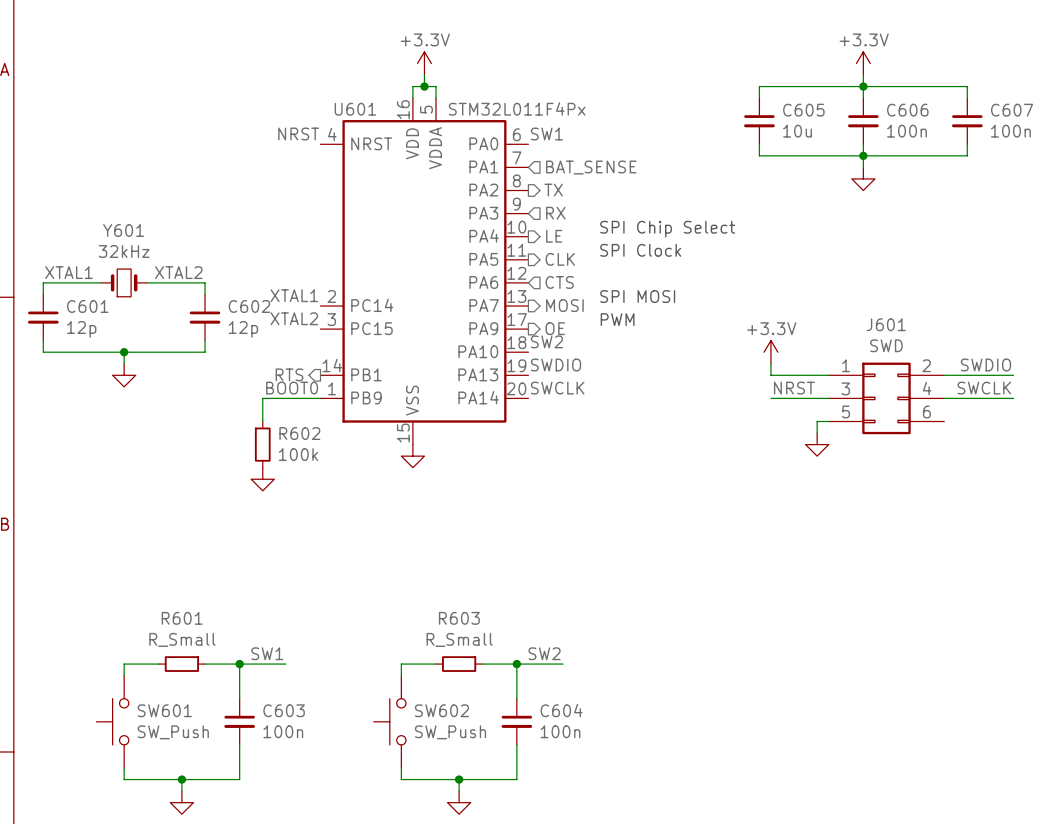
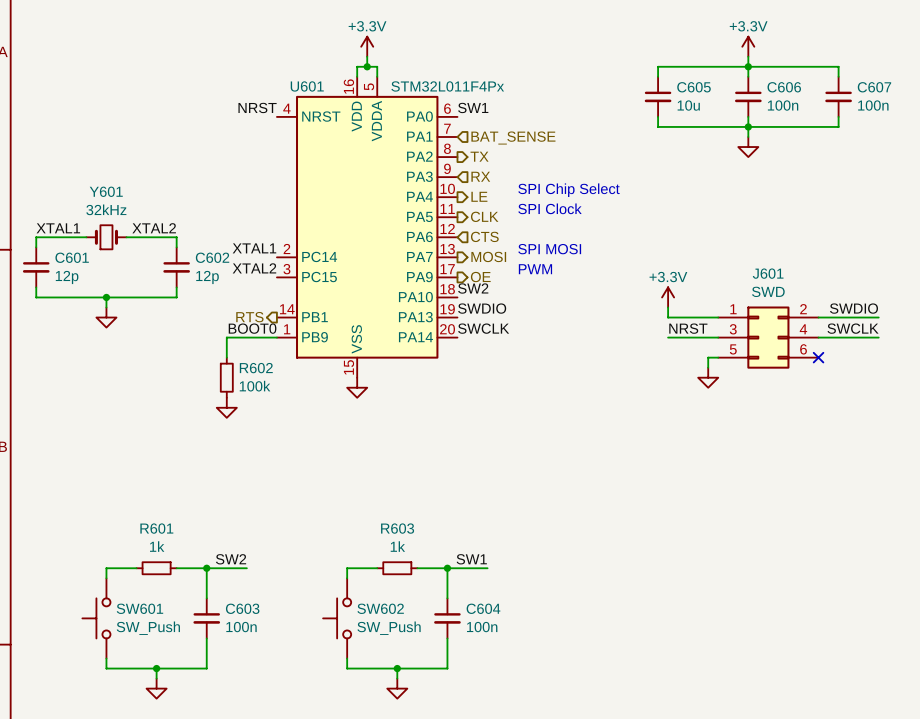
no-connect mark: none -> (818, 357)
R601 value: R_Small (182, 639) -> 1k (157, 546)
R603 value: R_Small (459, 639) -> 1k (397, 546)
label: SW1 (267, 653) -> SW2 (231, 559)
label: SW2 (544, 653) -> SW1 (471, 559)

